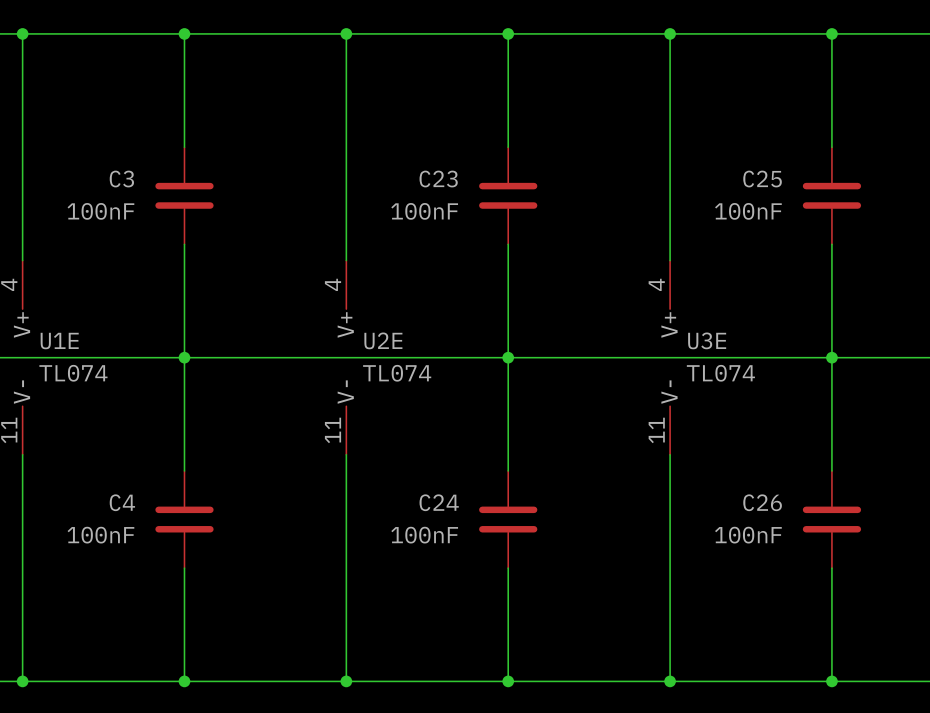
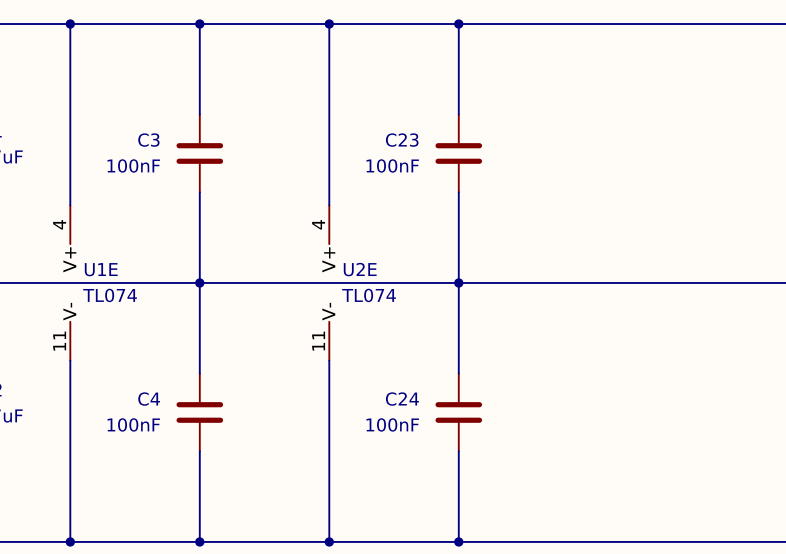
wire: (670, 33) (670, 260) -> none
junction: (670, 33) -> none
wire: (831, 33) (831, 147) -> none
junction: (831, 33) -> none
C25: 100nF (831, 195) -> none
wire: (831, 244) (831, 470) -> none
U3E: TL074 (670, 357) -> none
junction: (831, 357) -> none
wire: (670, 454) (670, 681) -> none
C26: 100nF (831, 519) -> none
wire: (831, 568) (831, 681) -> none
junction: (670, 681) -> none
junction: (831, 681) -> none

